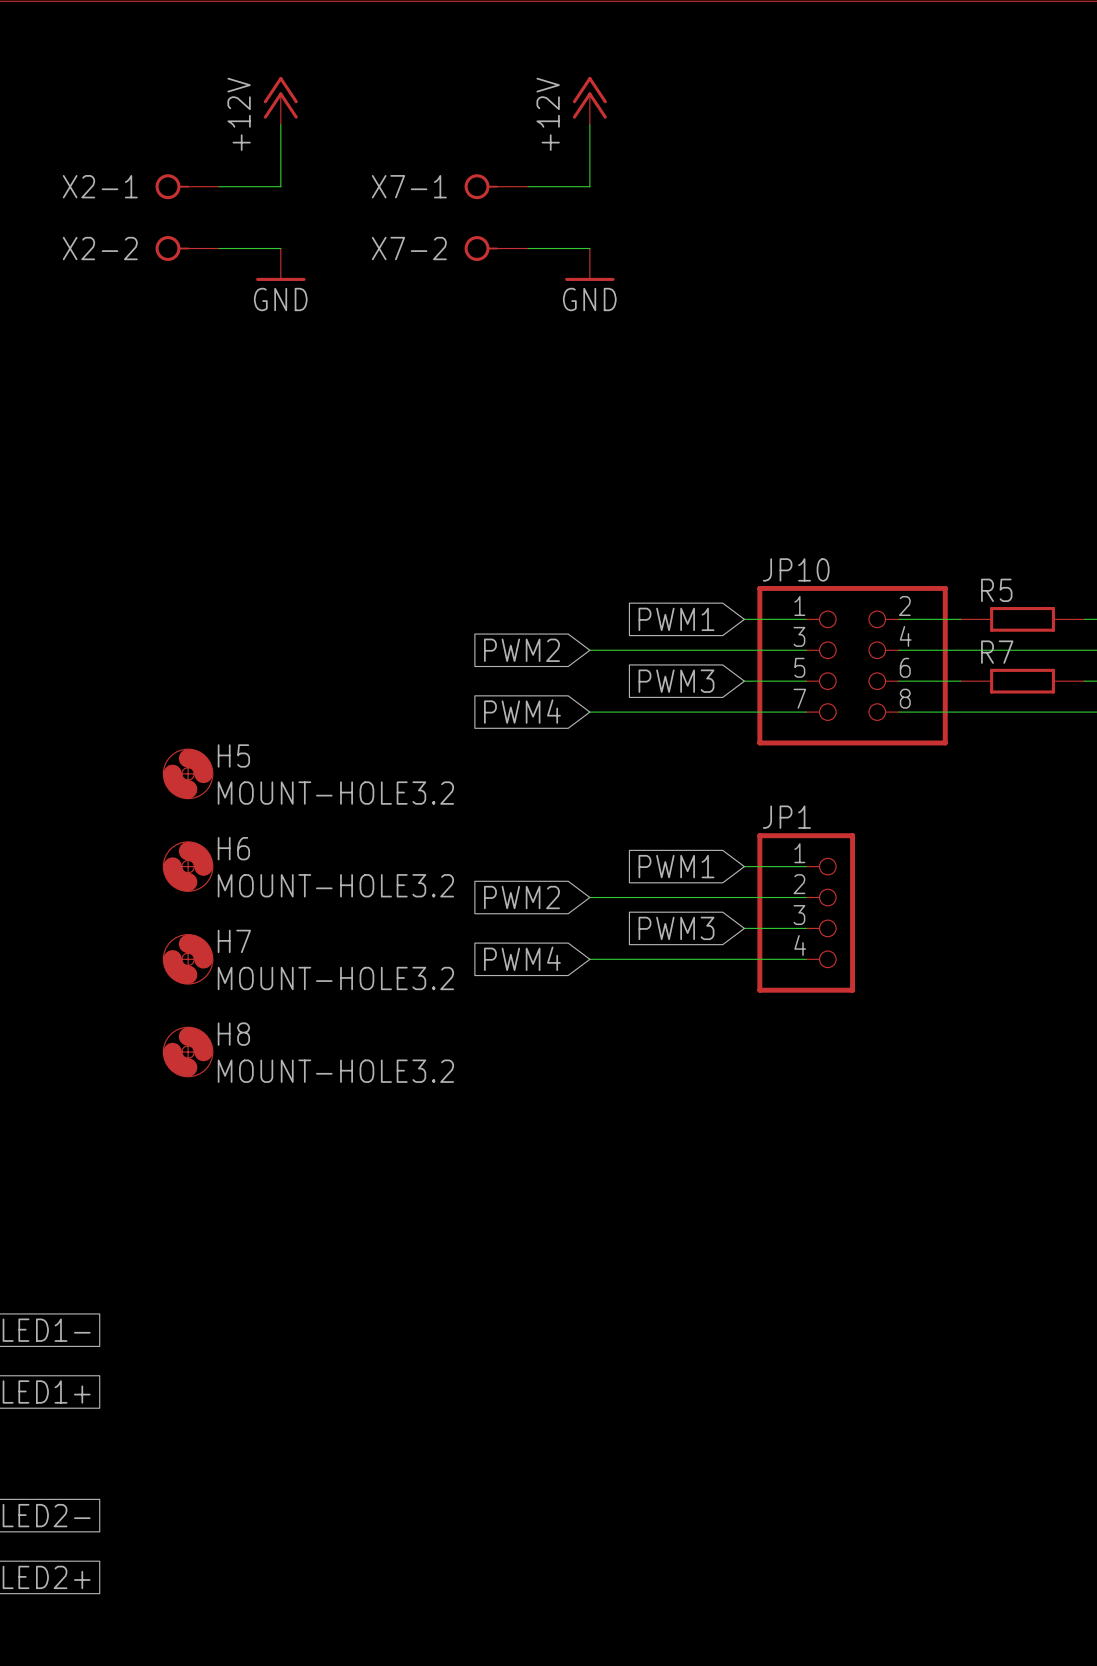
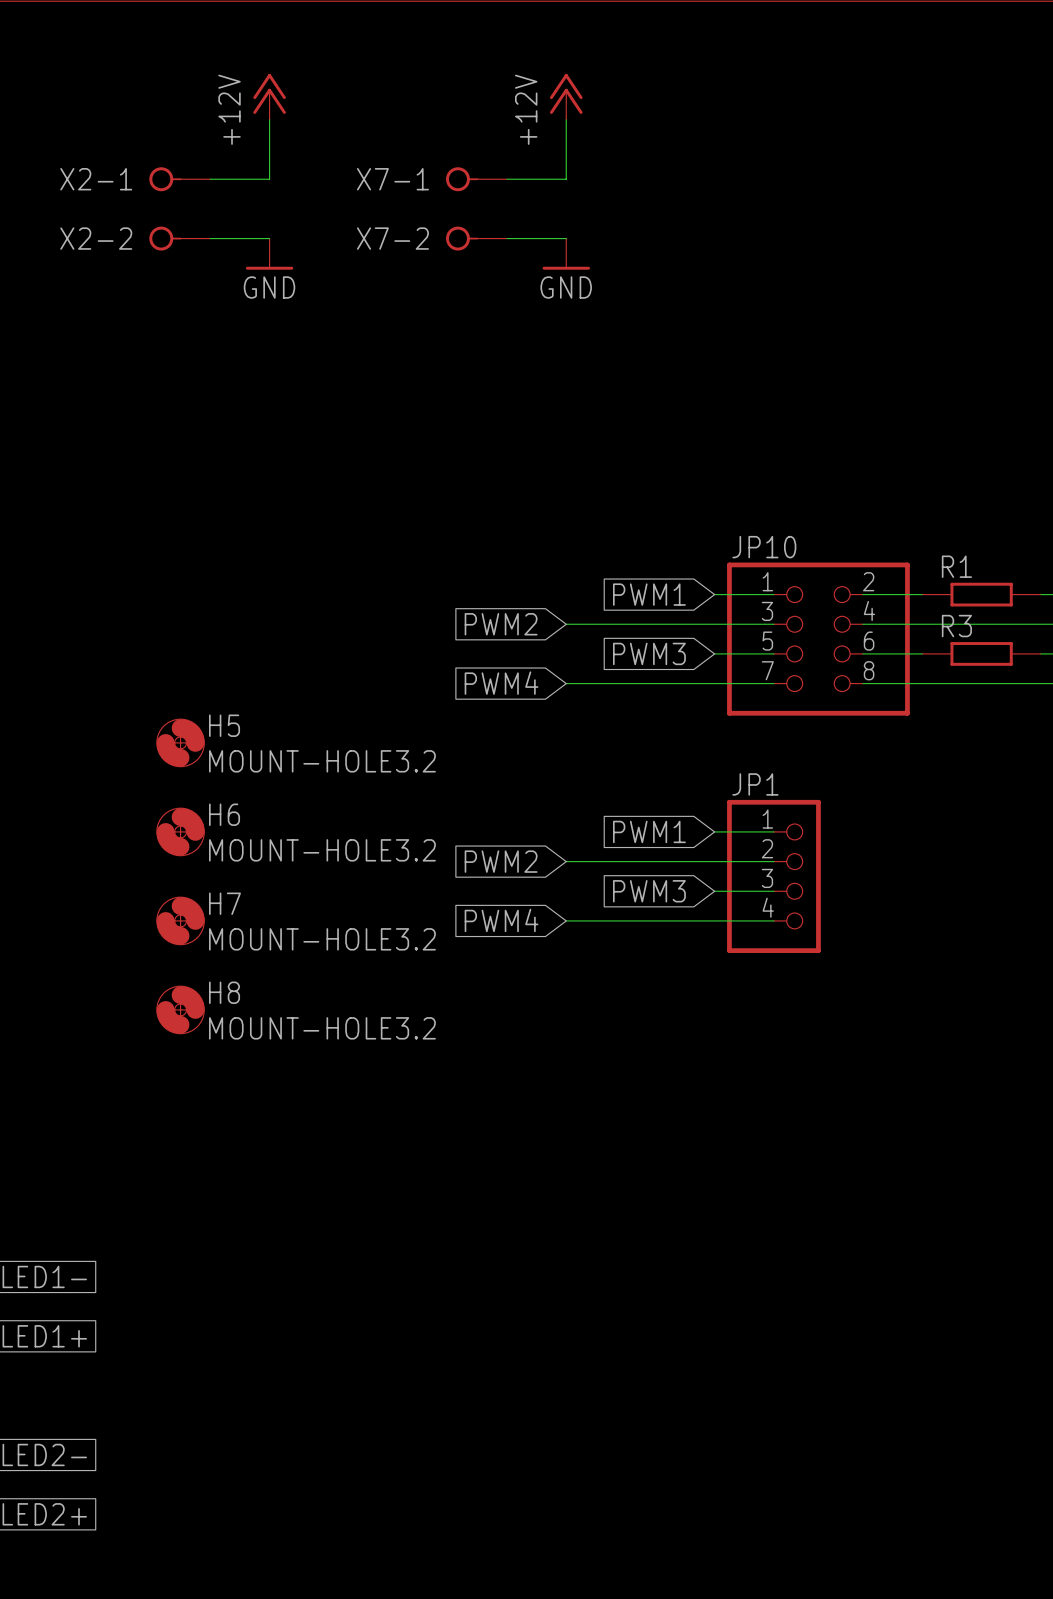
R5 name: R5 (996, 590) -> R1 (956, 566)
R7 name: R7 (997, 652) -> R3 (956, 626)

